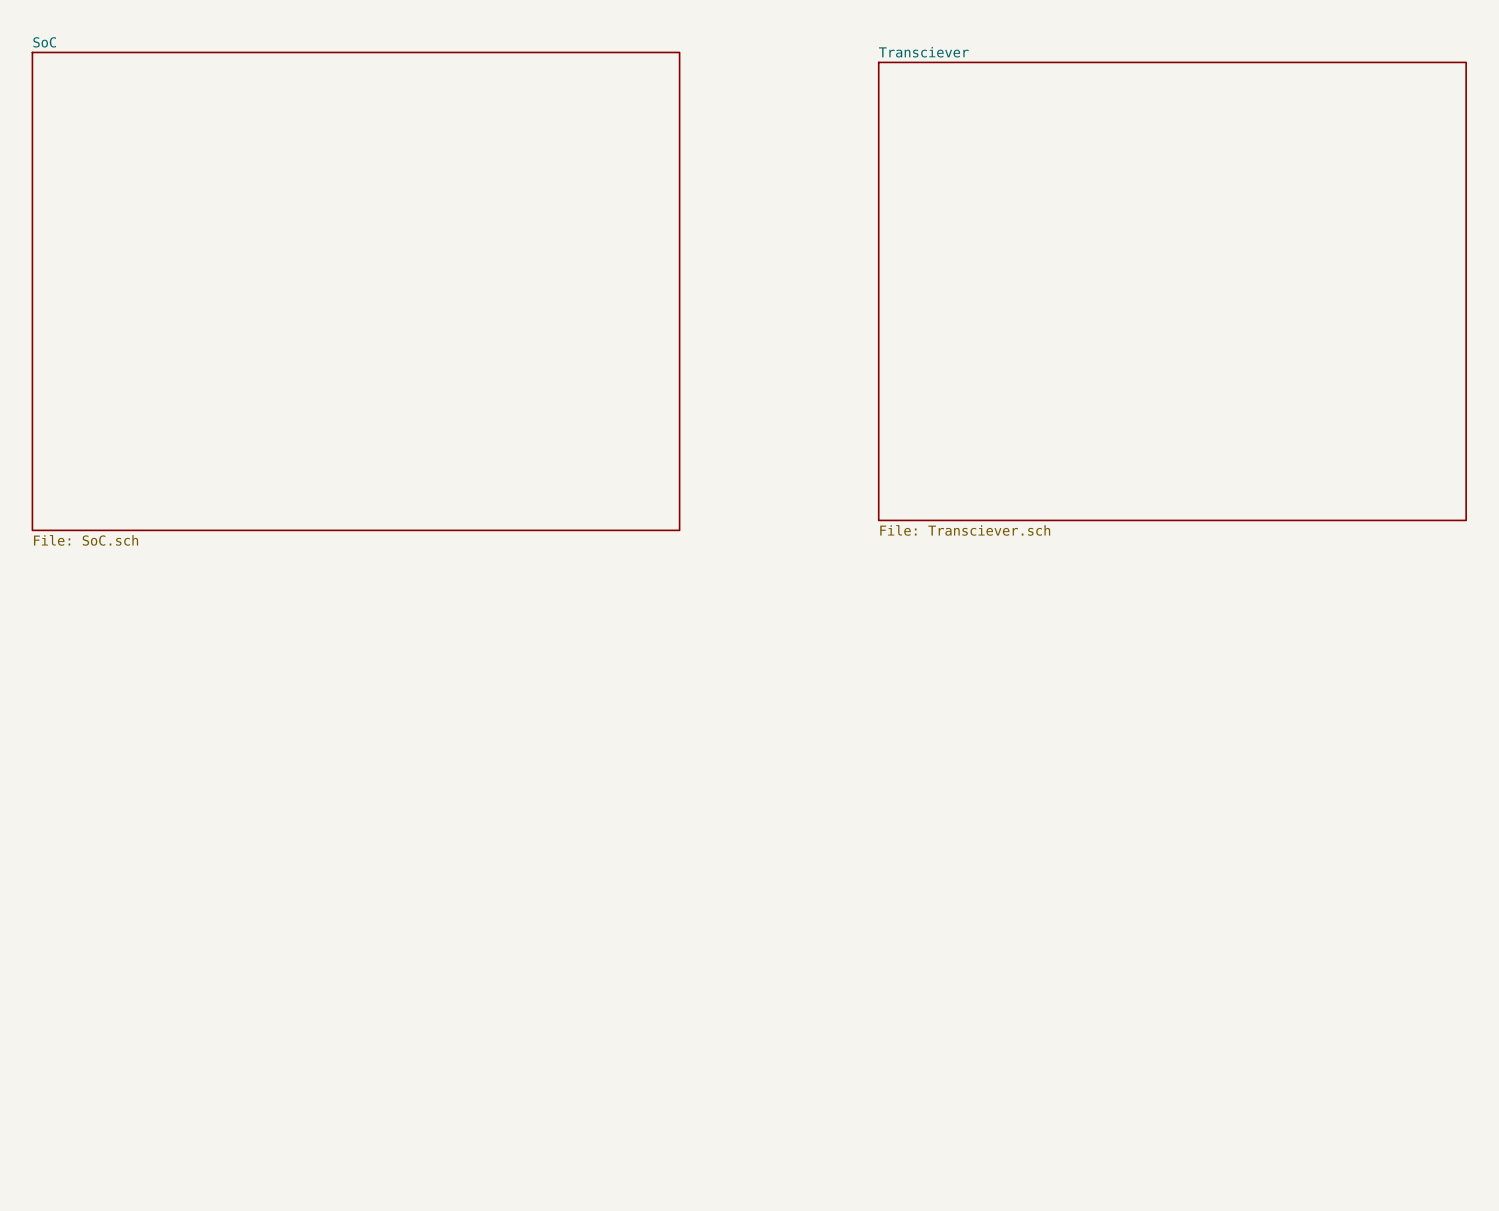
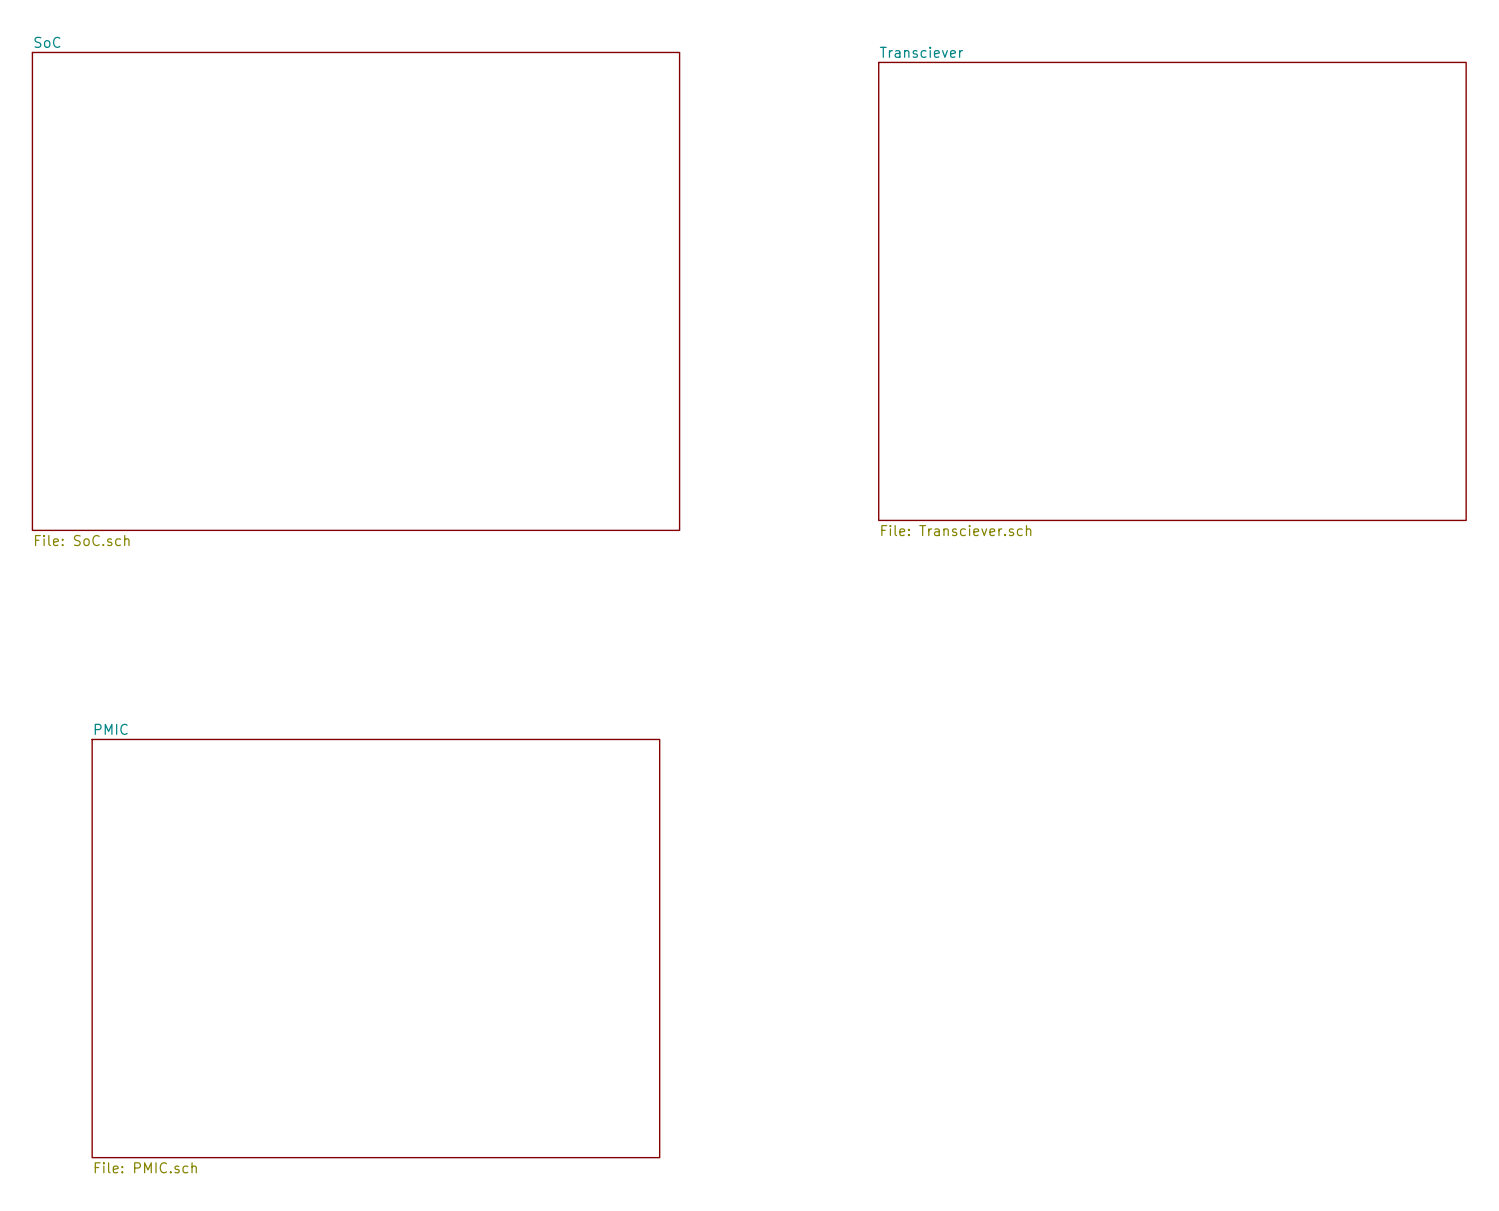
sheet PMIC: none -> File: PMIC.sch (375, 948)

